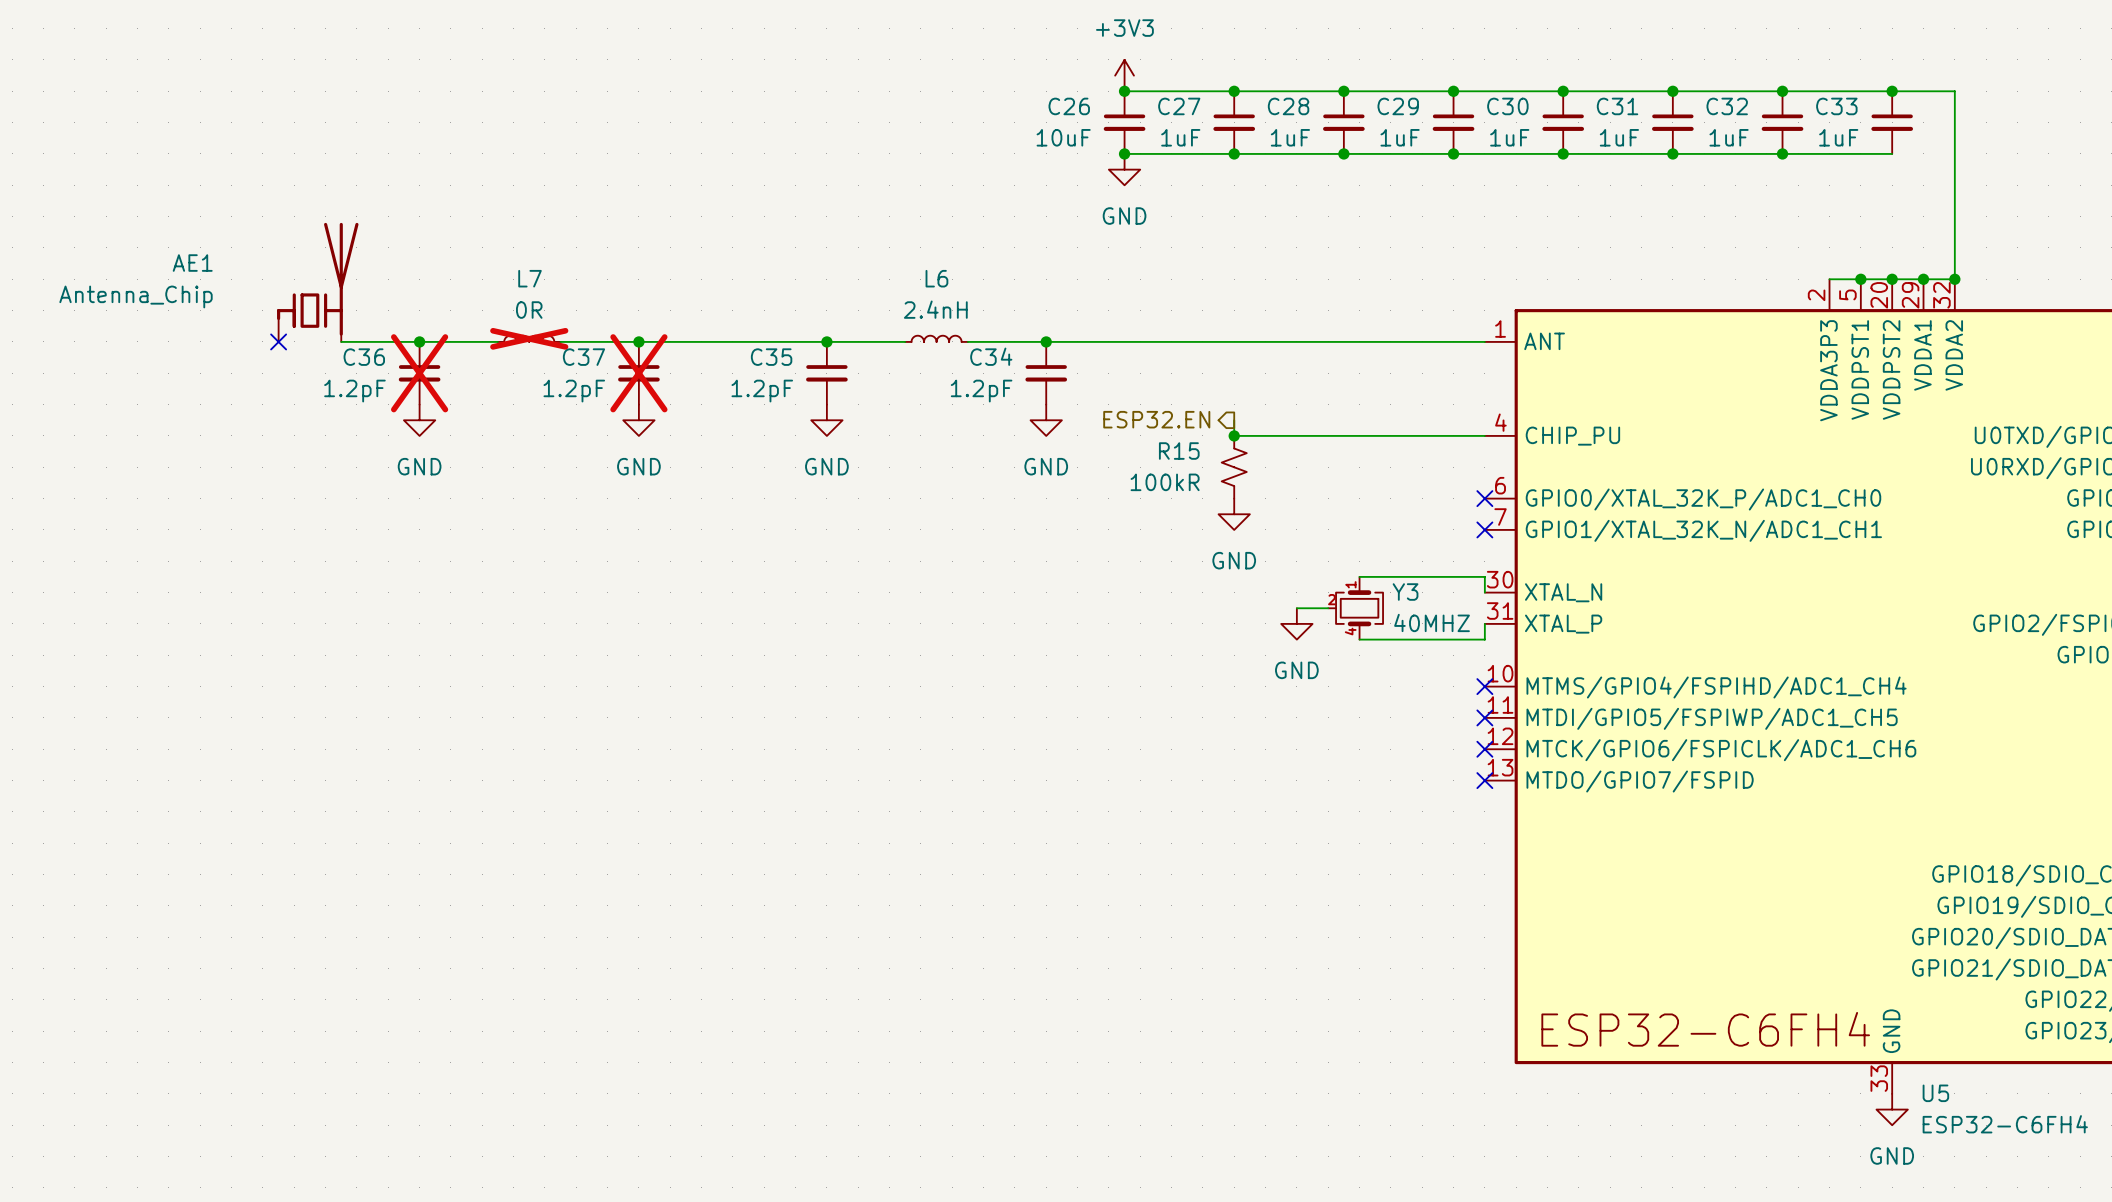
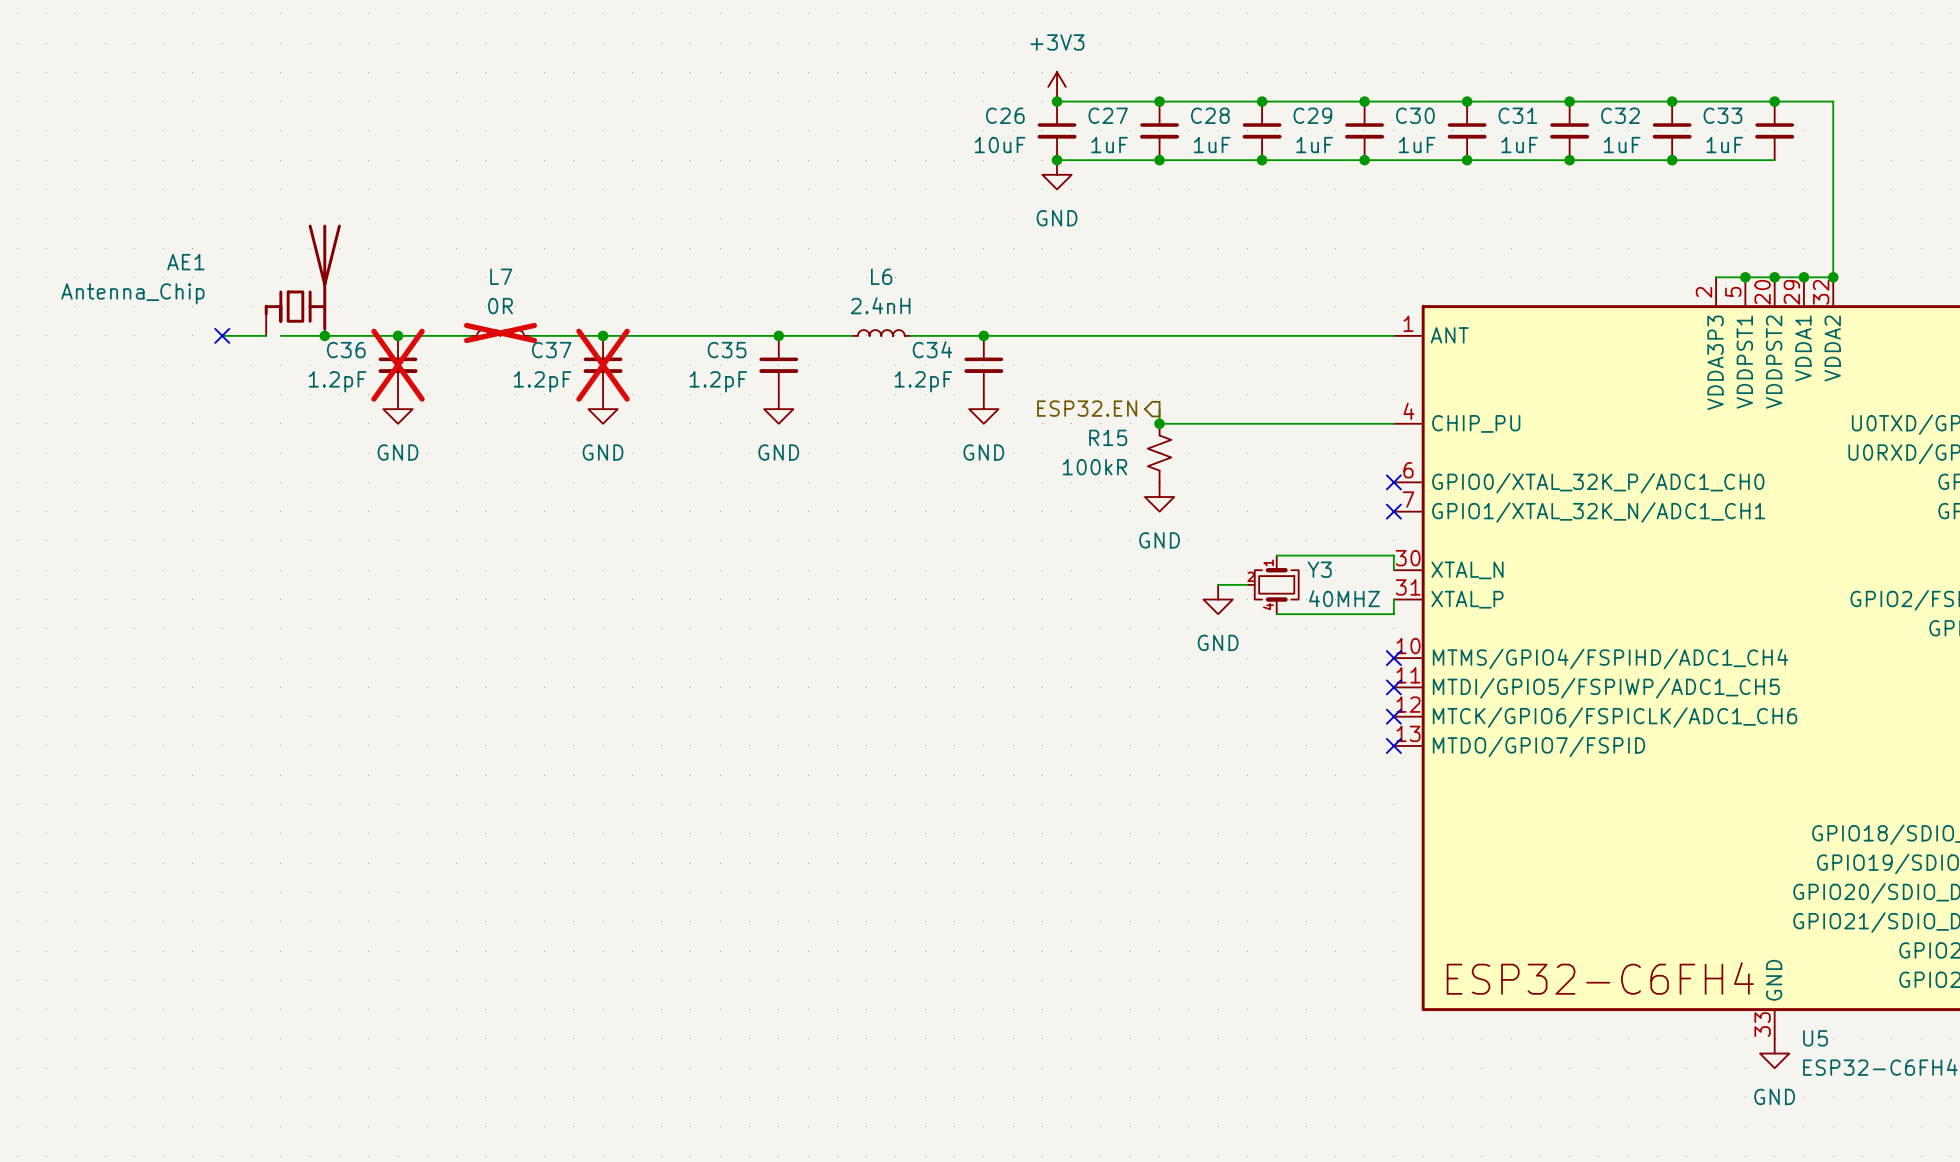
wire: none -> (222, 335) (266, 335)
no-connect mark position: (278, 341) -> (222, 335)
wire: none -> (280, 335) (324, 335)
junction: none -> (324, 335)

